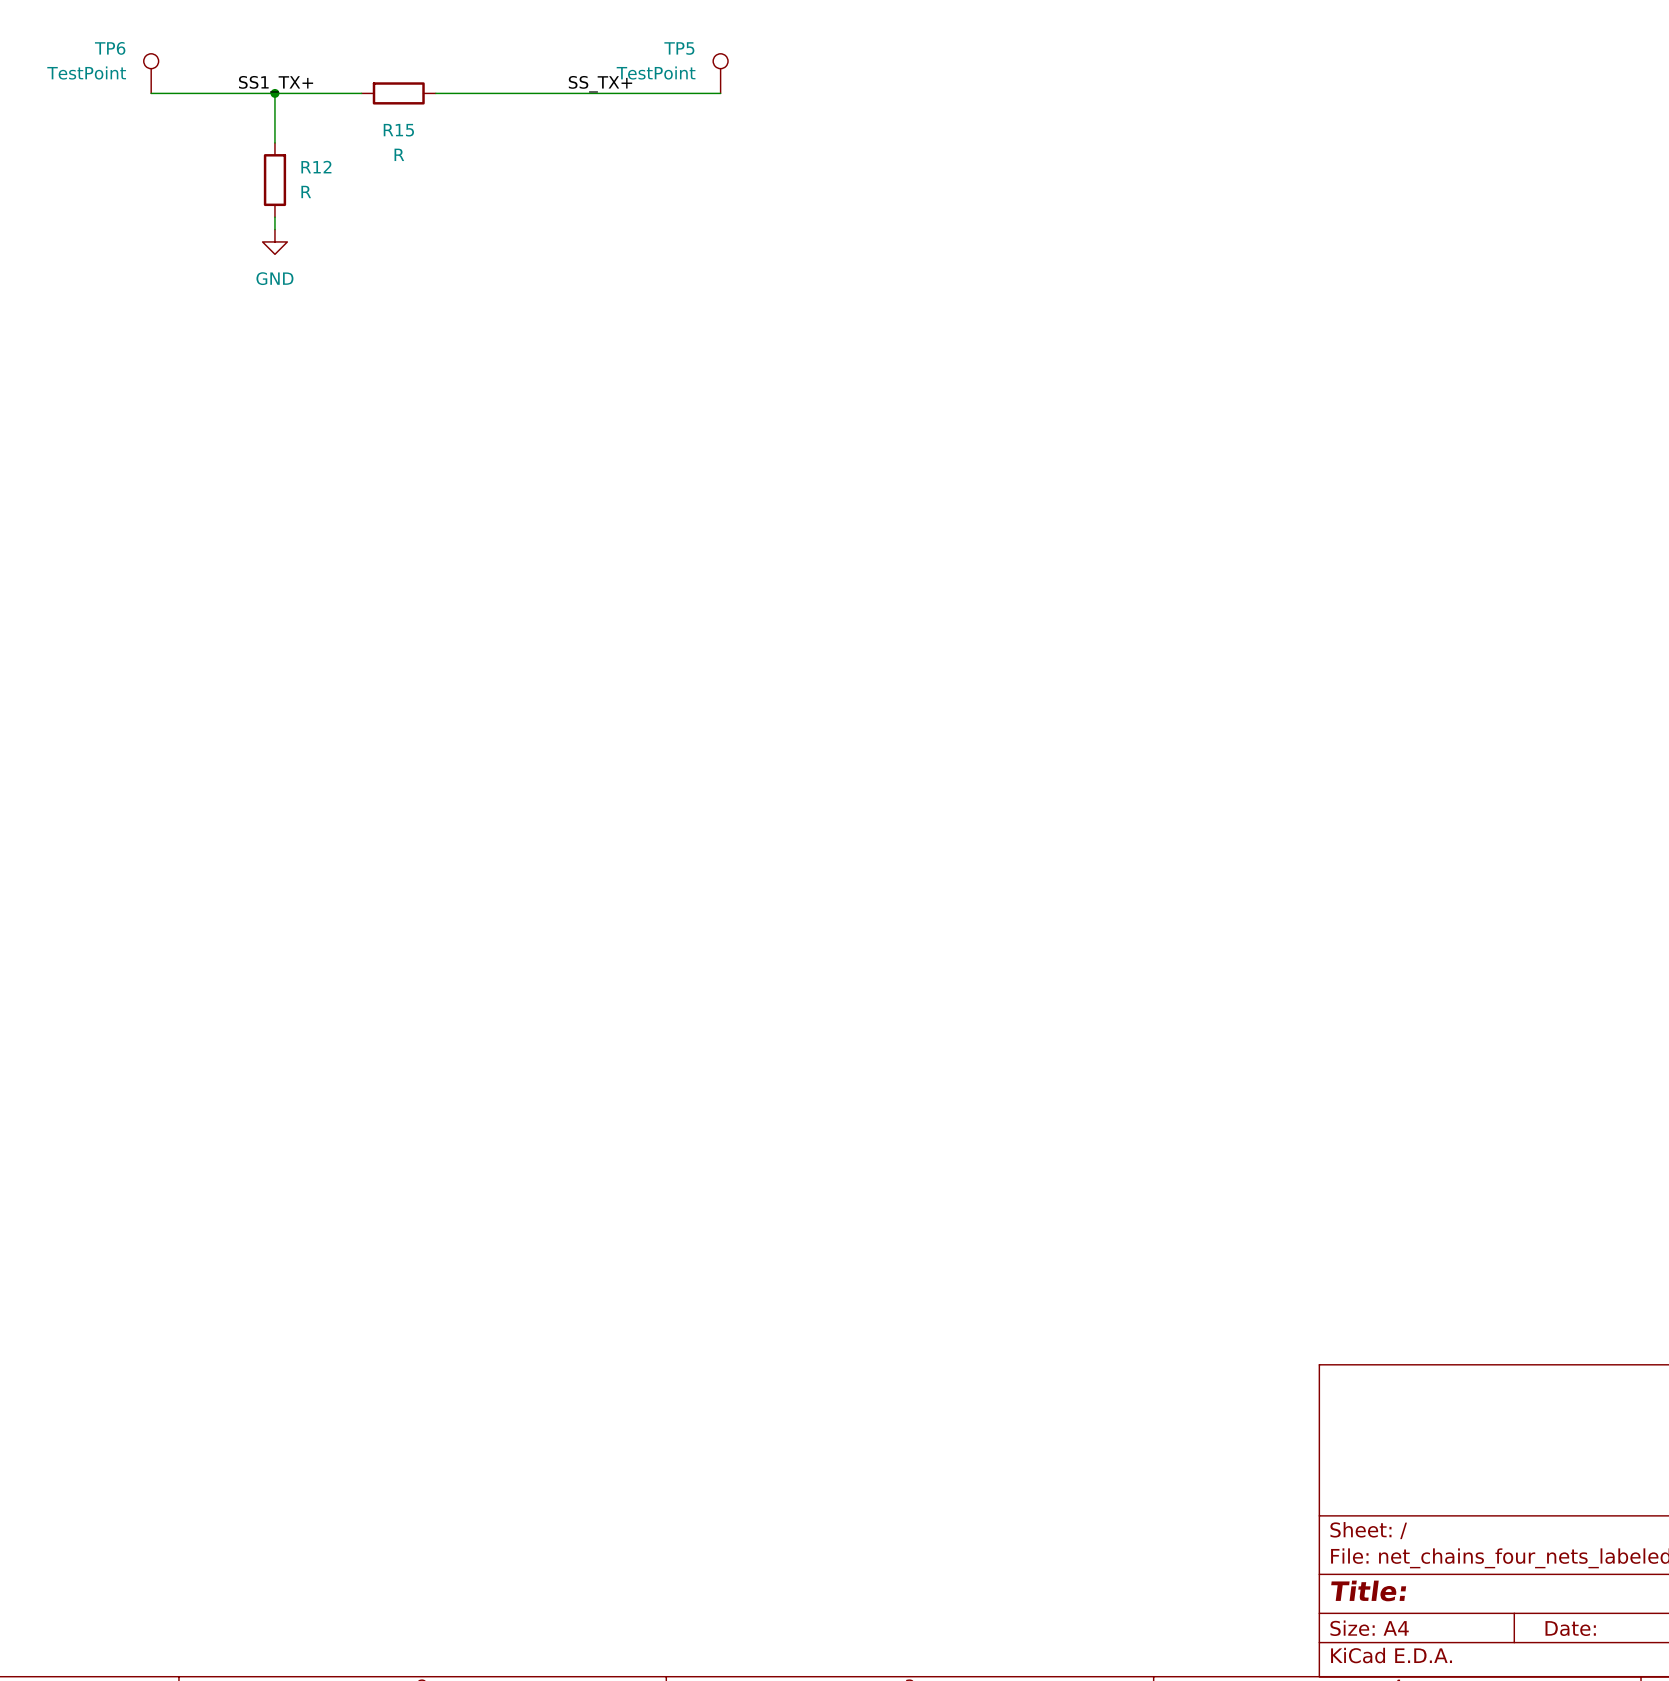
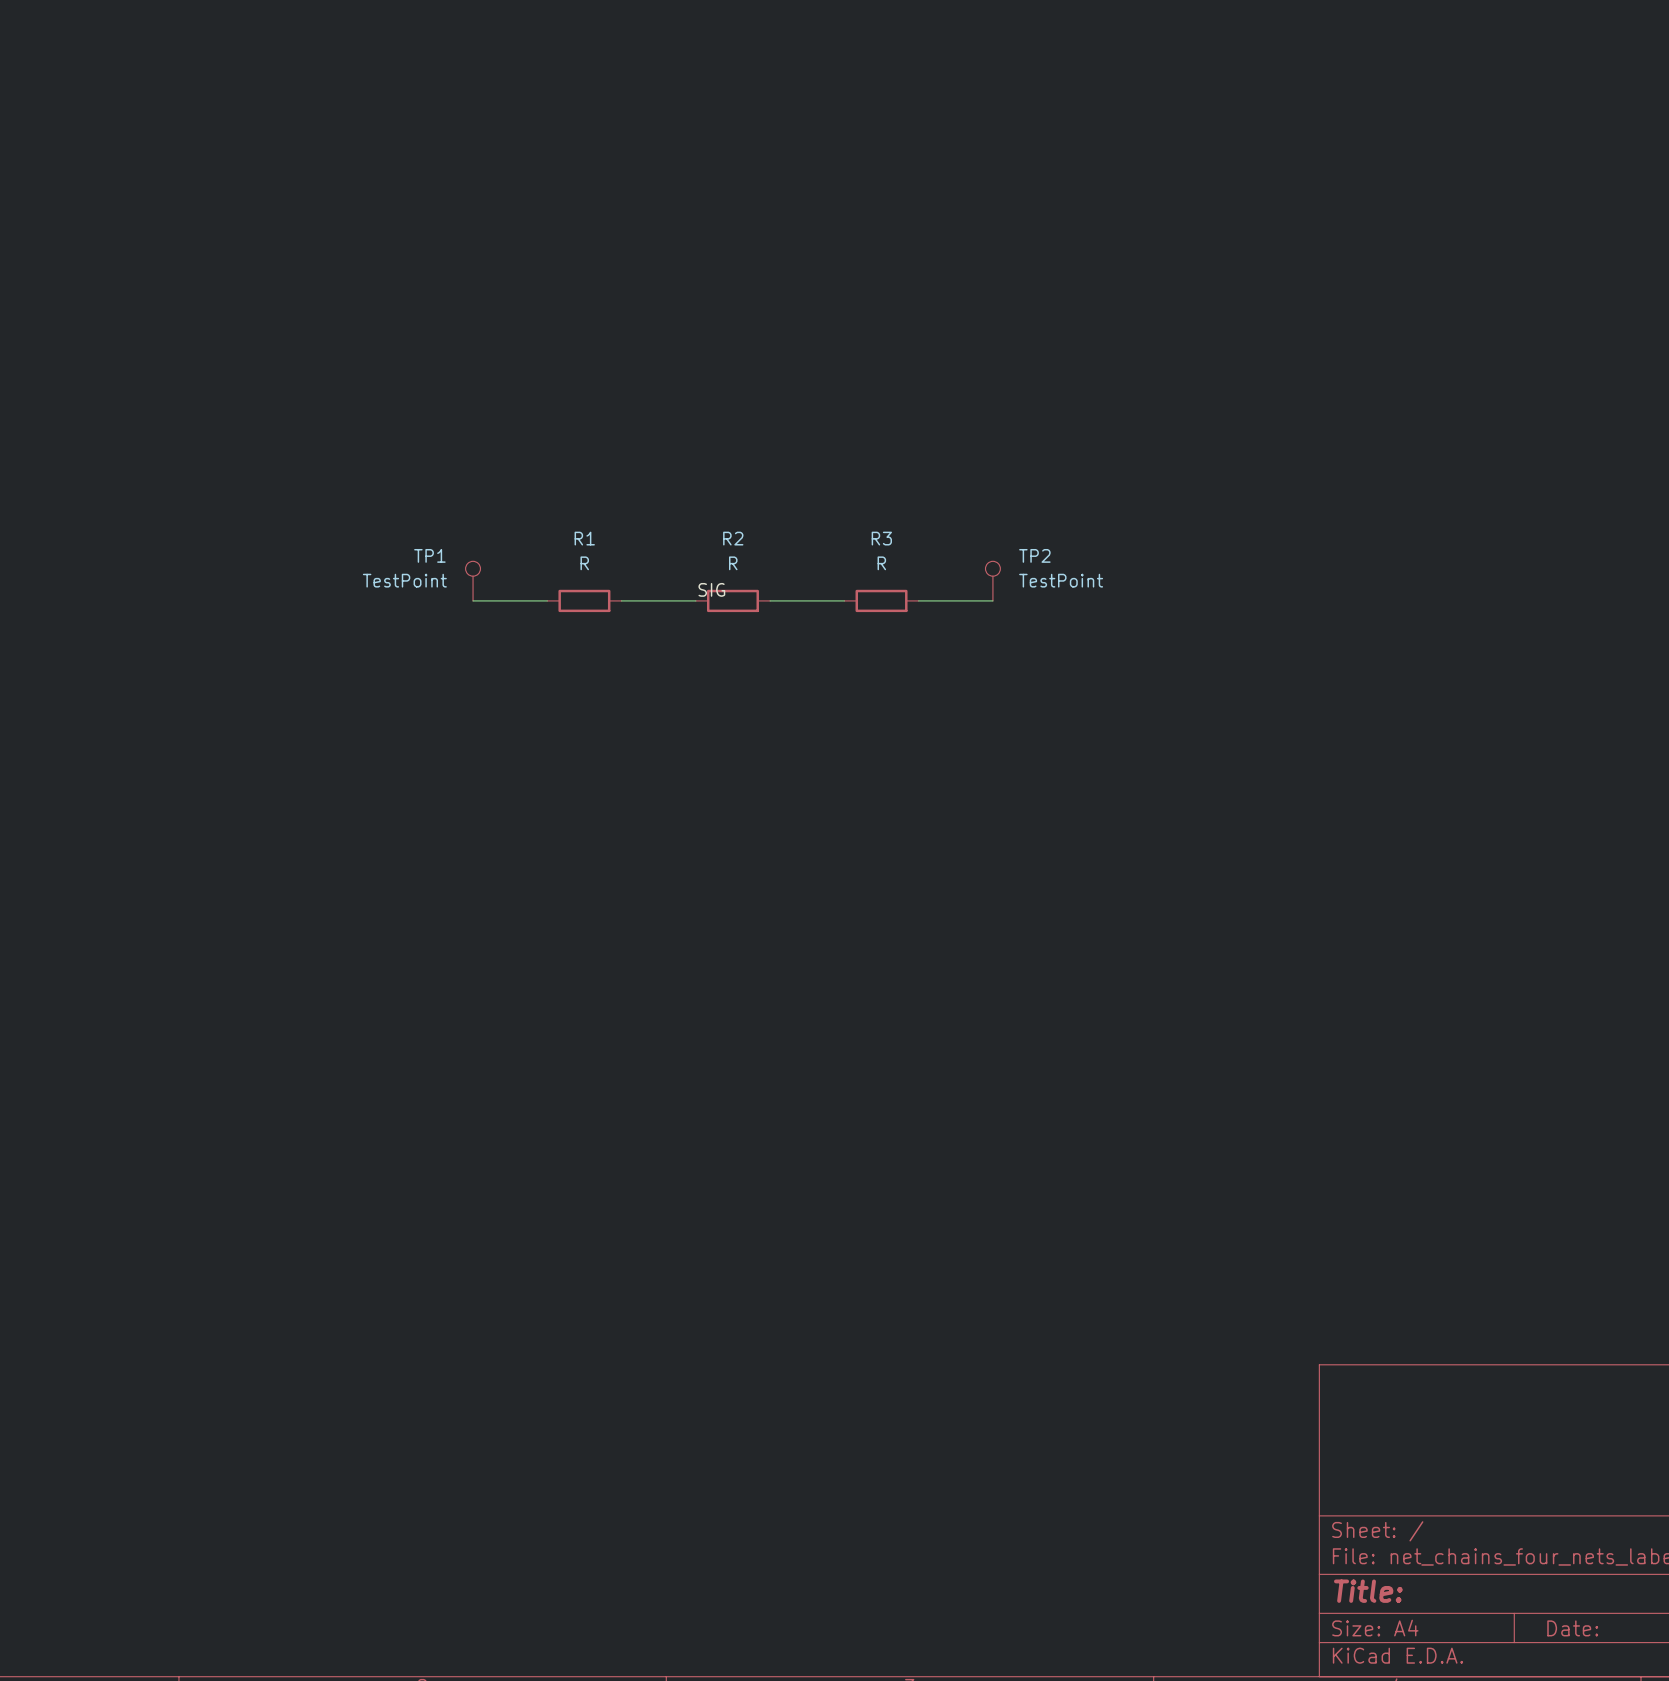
TP6: TestPoint (151, 73) -> none
TP5: TestPoint (720, 73) -> none
label: SS1_TX+ (276, 84) -> none
label: SS_TX+ (600, 84) -> none
wire: (151, 93) (361, 93) -> none
wire: (274, 93) (274, 142) -> none
junction: (274, 93) -> none
R15: R (398, 93) -> none
wire: (435, 93) (720, 93) -> none
R12: R (274, 180) -> none
wire: (274, 217) (274, 229) -> none
power symbol: GND (274, 241) -> none
TP1: none -> TestPoint (473, 581)
TP2: none -> TestPoint (992, 581)
label: none -> SIG (711, 589)
wire: none -> (473, 600) (547, 600)
R1: none -> R (584, 600)
wire: none -> (621, 600) (695, 600)
R2: none -> R (732, 600)
wire: none -> (770, 600) (844, 600)
R3: none -> R (881, 600)
wire: none -> (918, 600) (992, 600)

